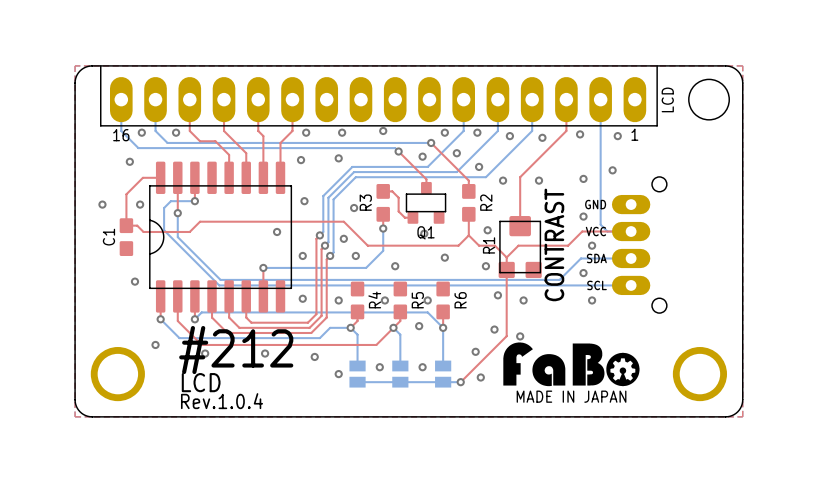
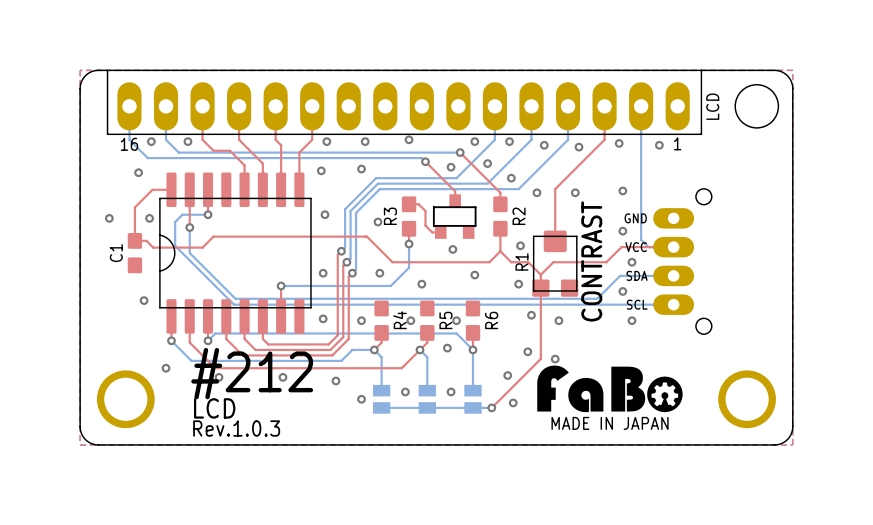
via: (612, 170) -> none
Q1: (426, 202) -> none
part: none -> (454, 216)
via: (277, 231) -> none
via: (343, 238) -> none
text: Rev.1.0.4 (222, 401) -> Rev.1.0.3 (236, 428)

